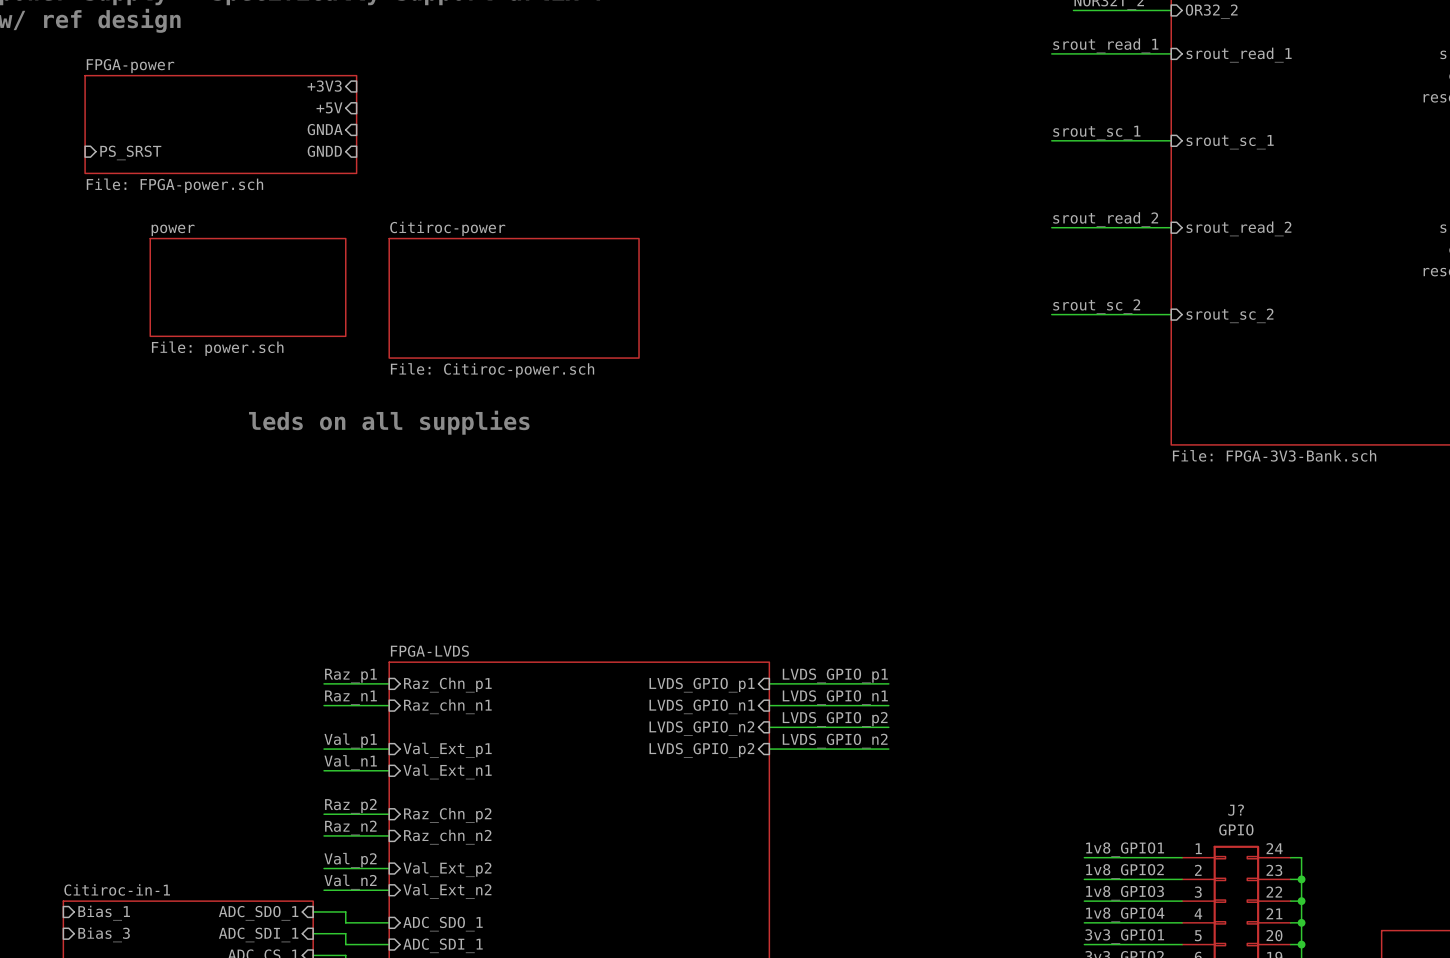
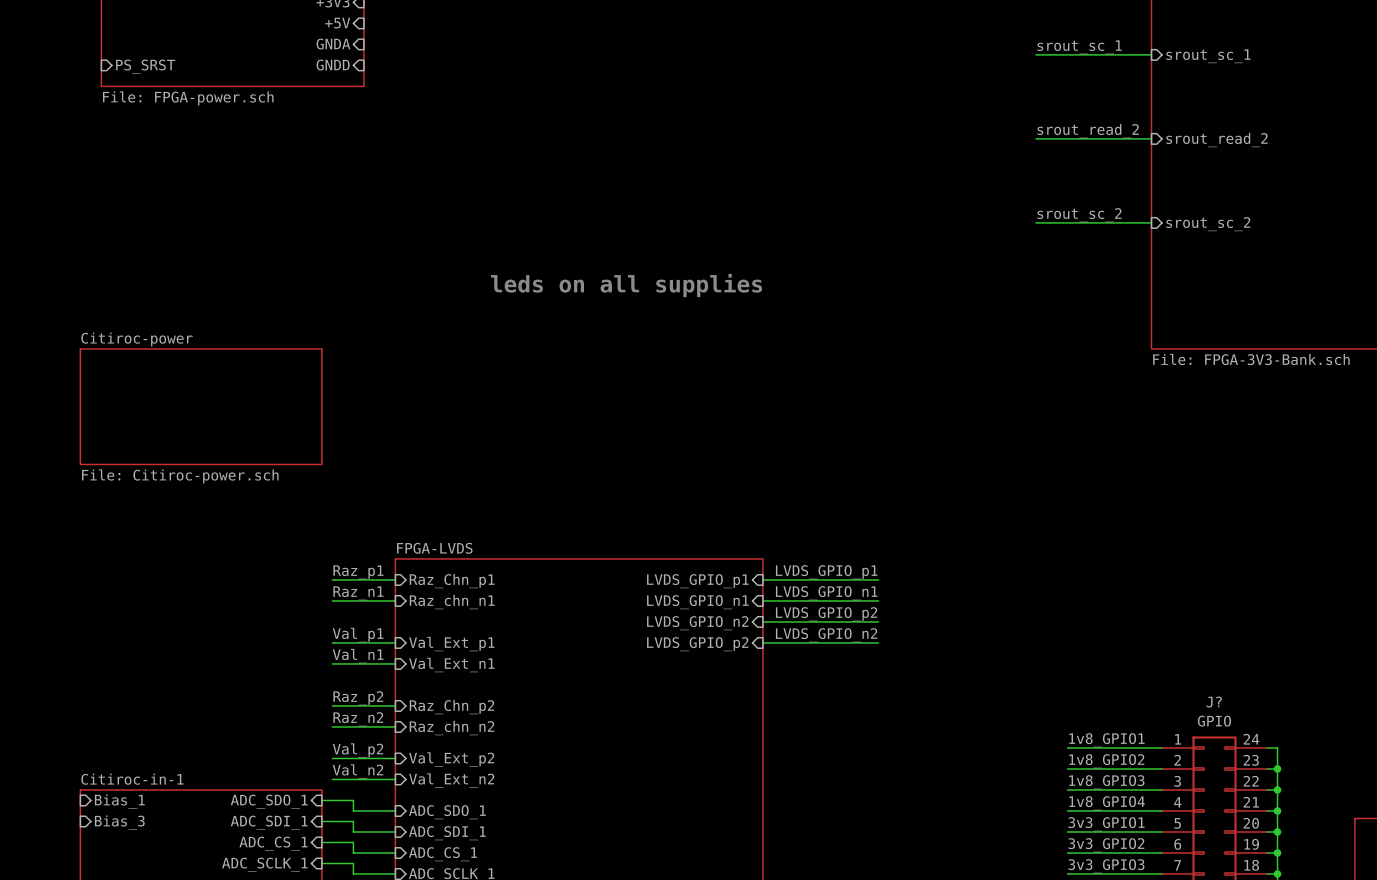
sheet power: File: power.sch (248, 287) -> none
sheet Citiroc-power: File: Citiroc-power.sch (514, 298) -> none
text: none -> leds on all supplies (626, 285)
text: leds on all supplies (389, 422) -> none
sheet Citiroc-power: none -> File: Citiroc-power.sch (201, 406)

